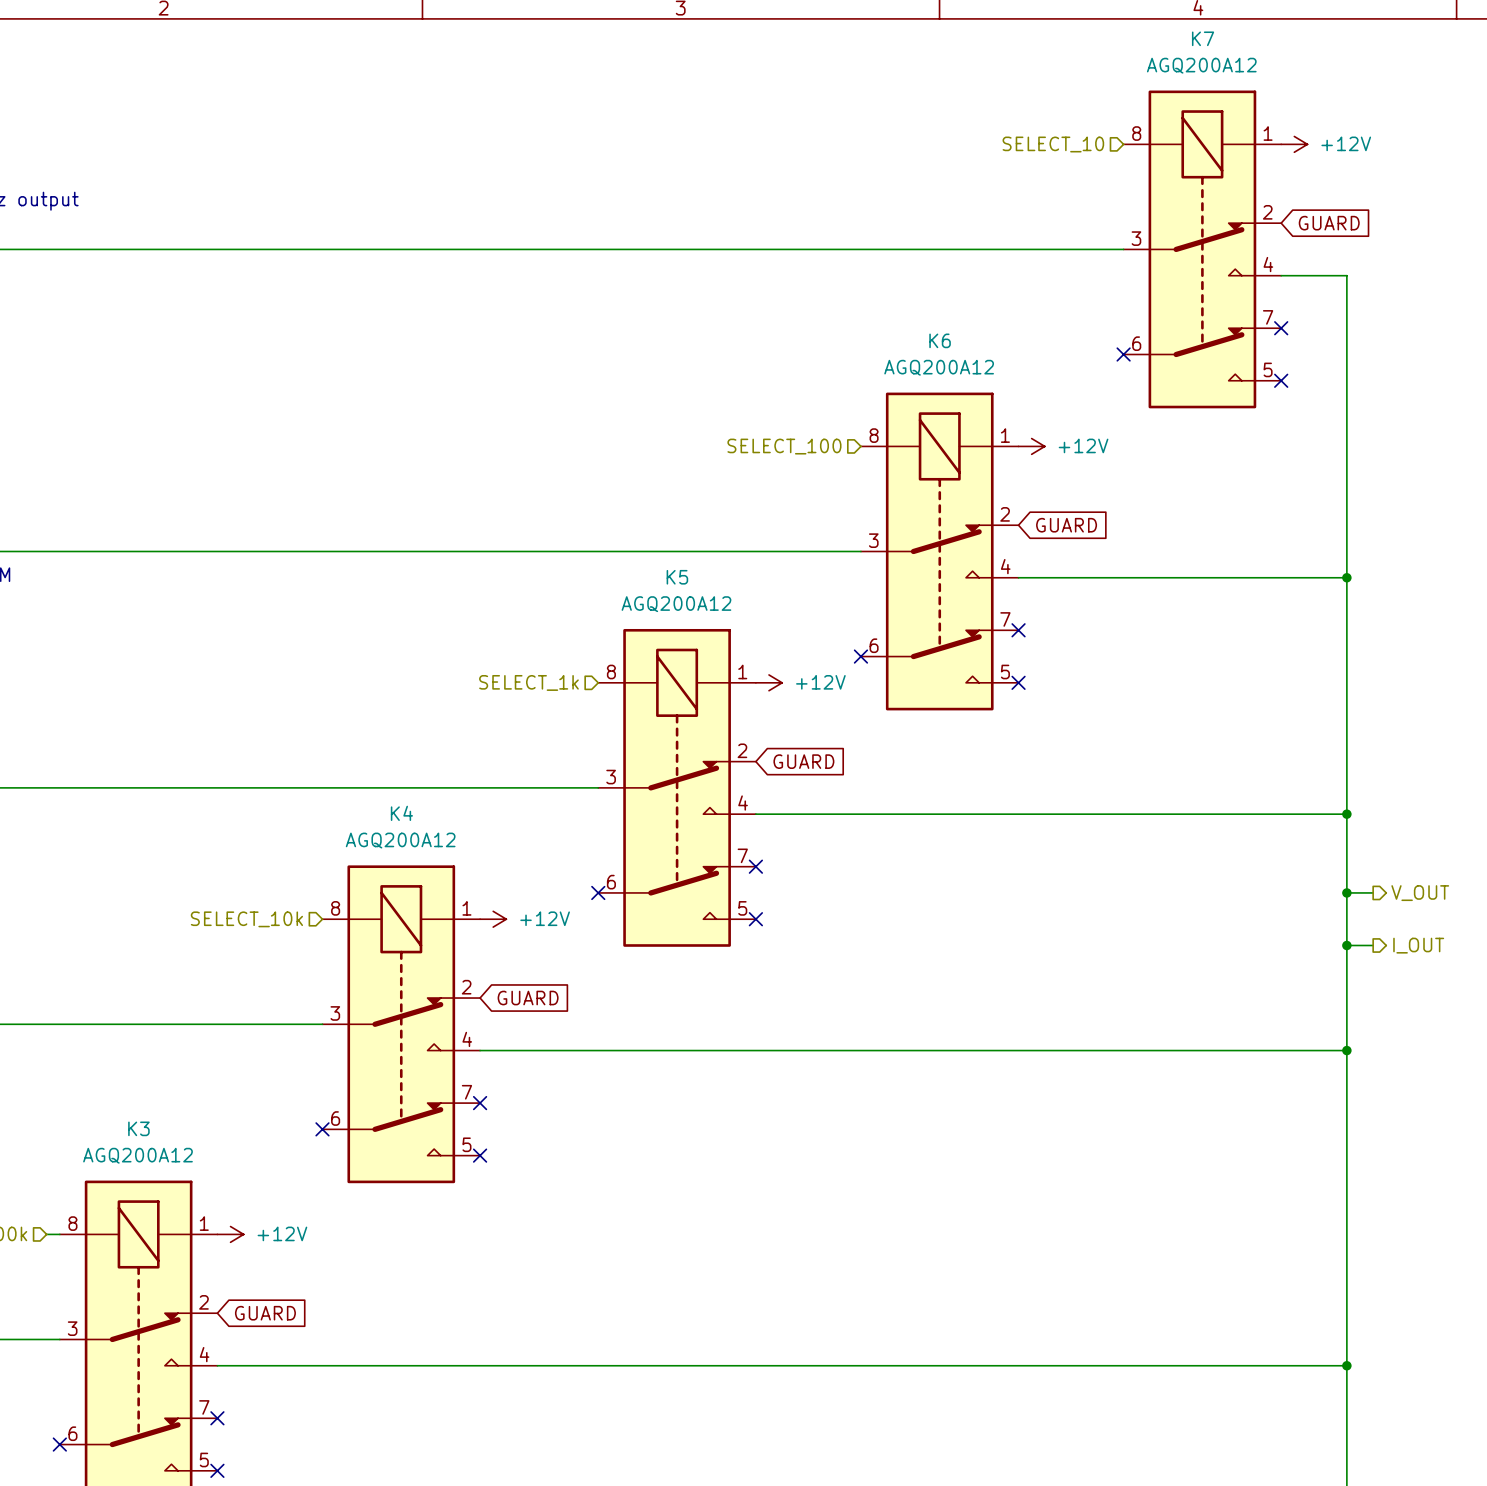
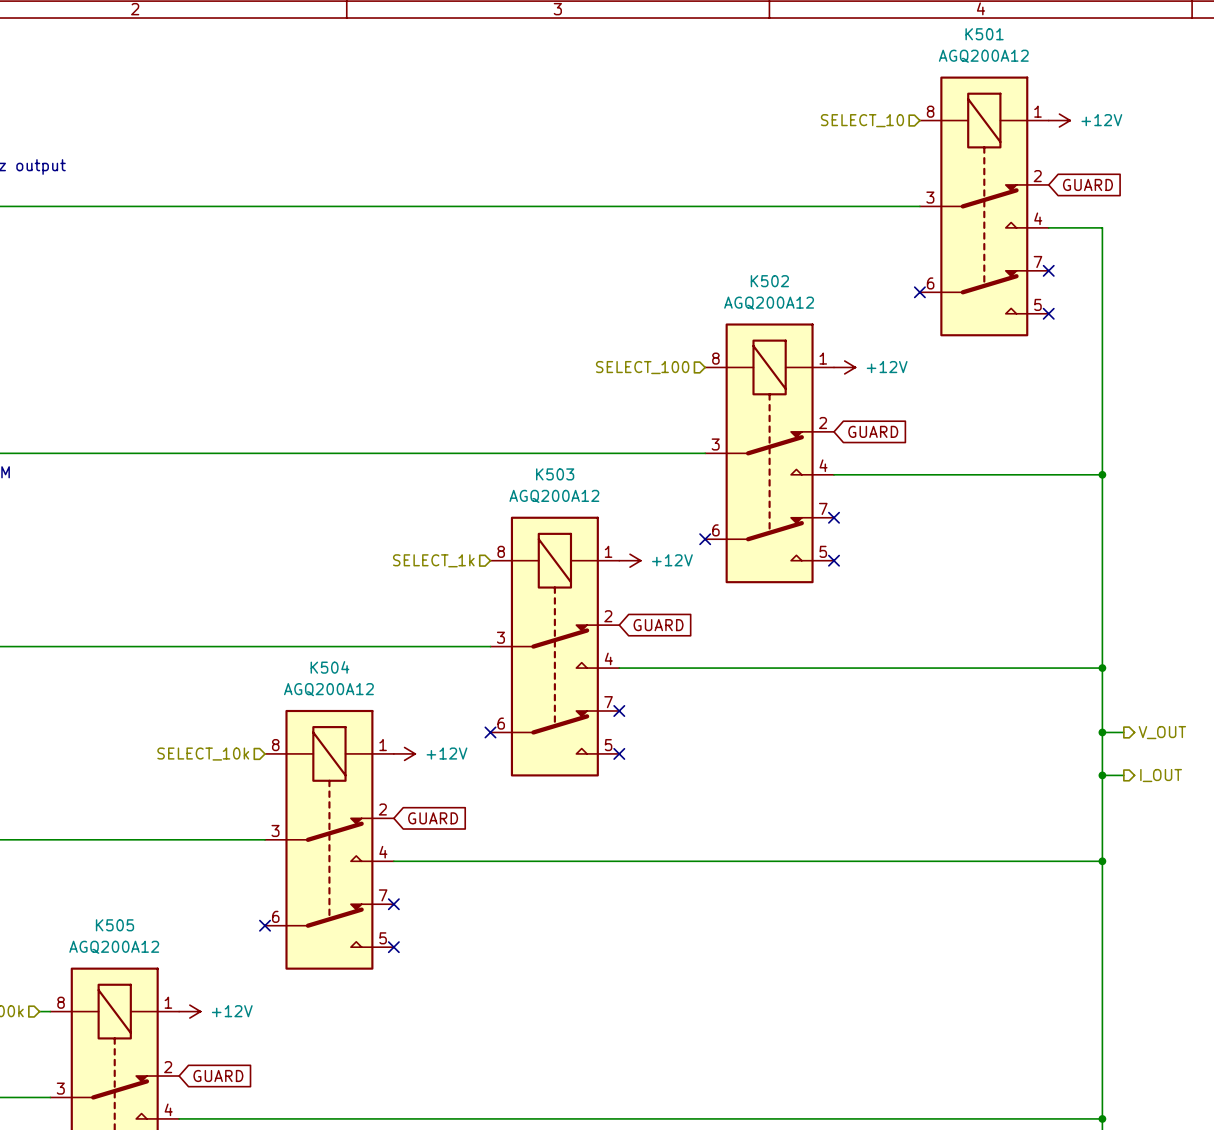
K7 name: K7 (1203, 38) -> K501 (984, 34)
K6 name: K6 (940, 340) -> K502 (769, 281)
K5 name: K5 (677, 577) -> K503 (555, 474)
K4 name: K4 (401, 813) -> K504 (329, 667)
K3 name: K3 (138, 1128) -> K505 (114, 925)

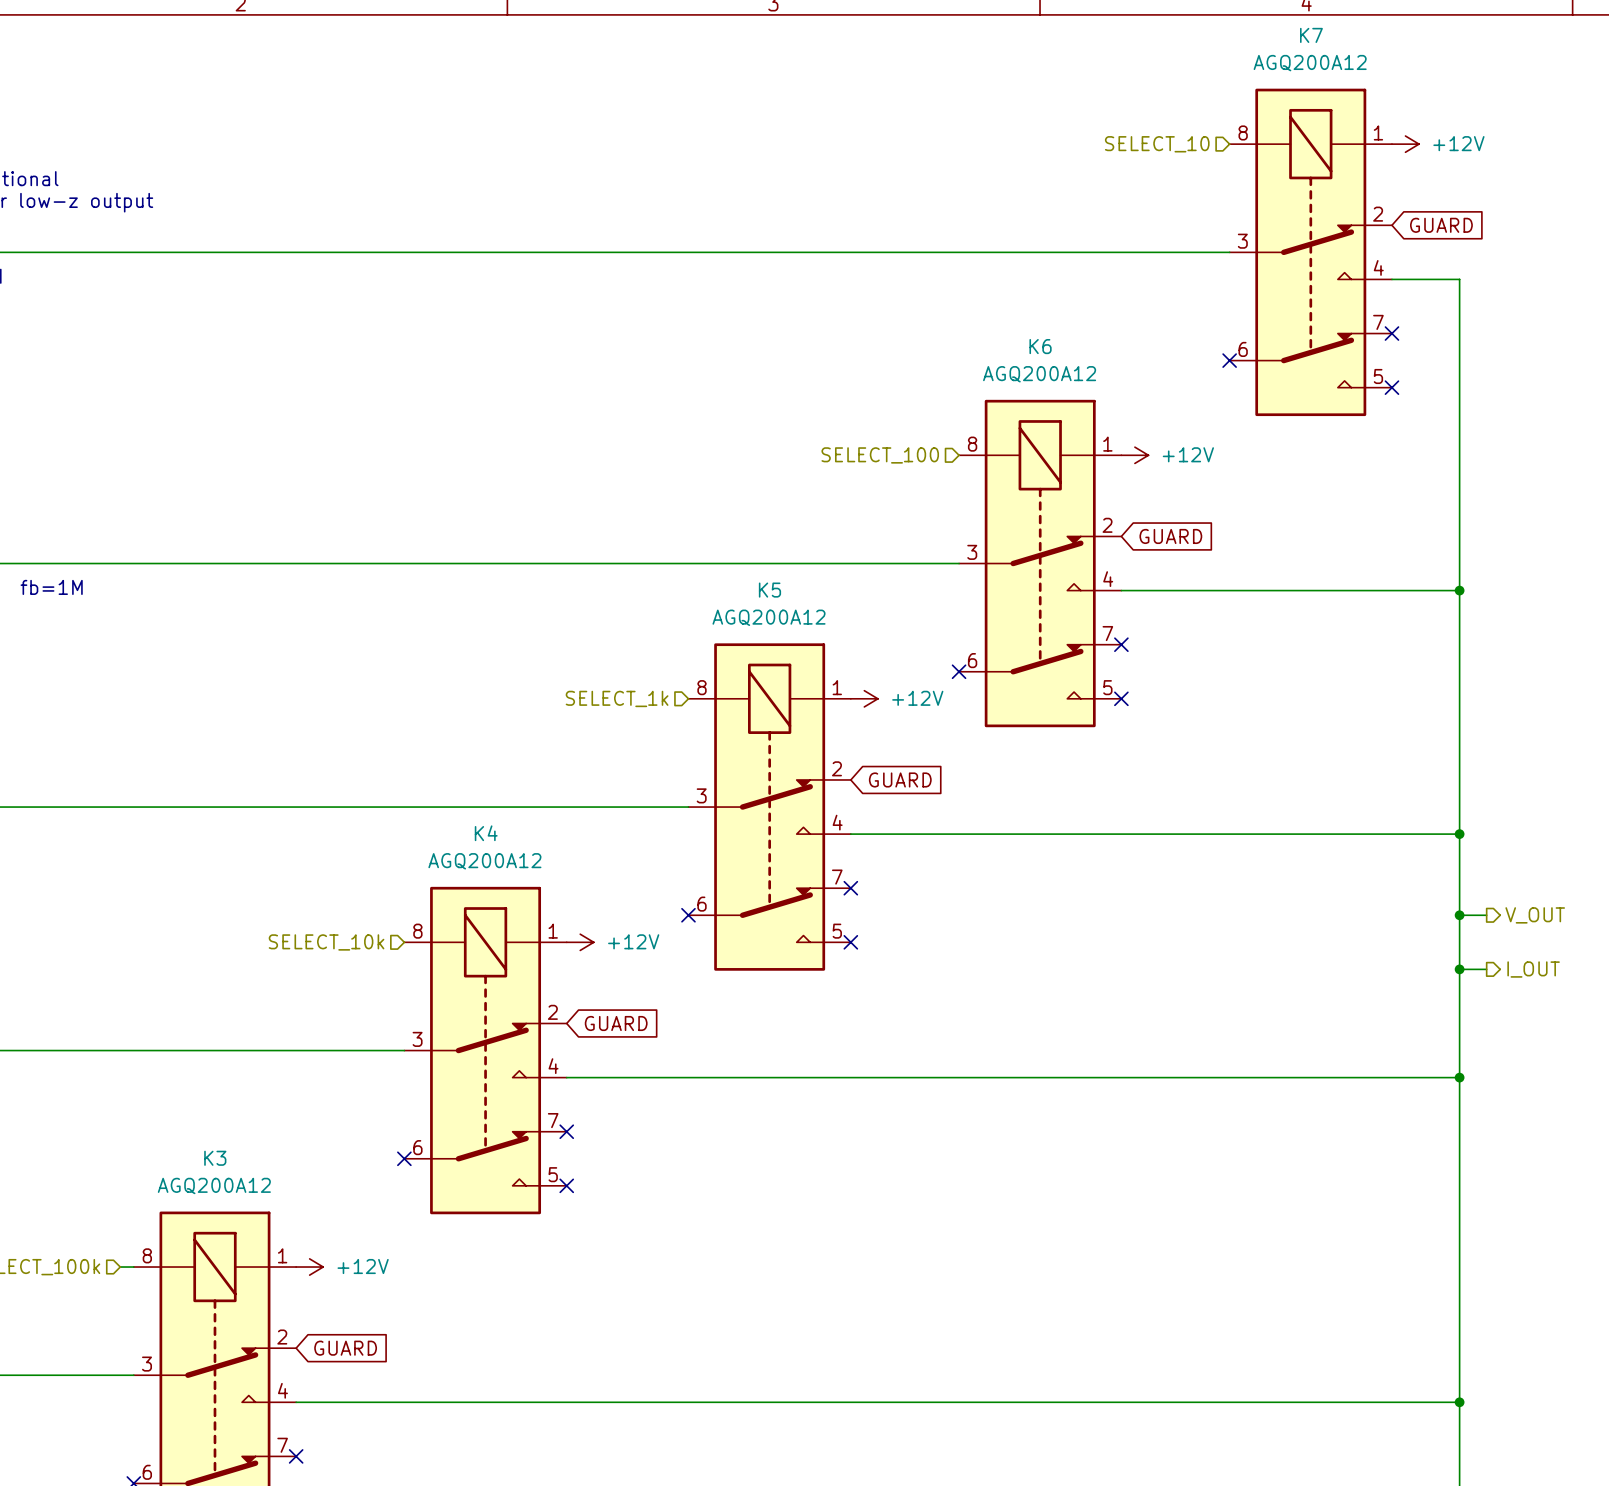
K501 name: K501 (984, 34) -> K7 (1311, 35)
K502 name: K502 (769, 281) -> K6 (1040, 346)
K503 name: K503 (555, 474) -> K5 (769, 590)
K504 name: K504 (329, 667) -> K4 (486, 833)
K505 name: K505 (114, 925) -> K3 (215, 1158)

